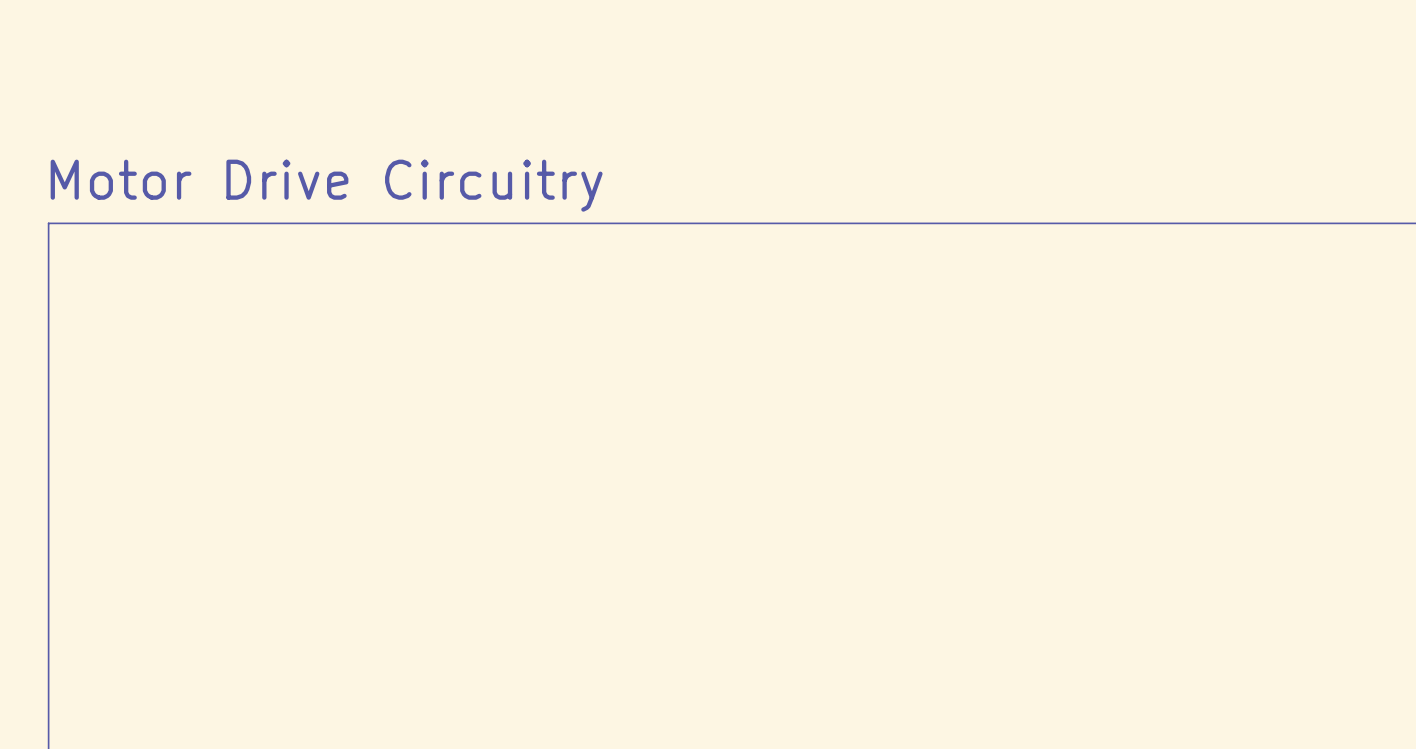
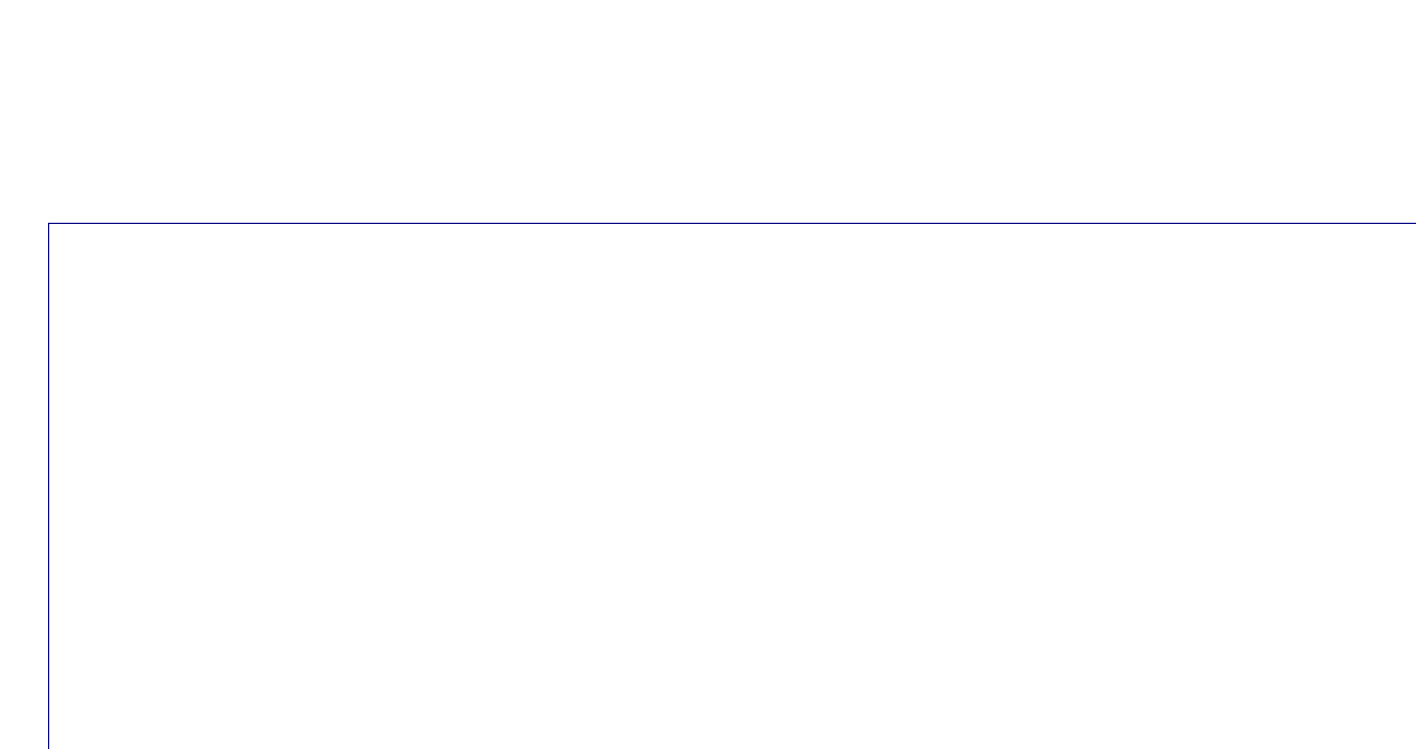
text: Motor Drive Circuitry (326, 185) -> none

